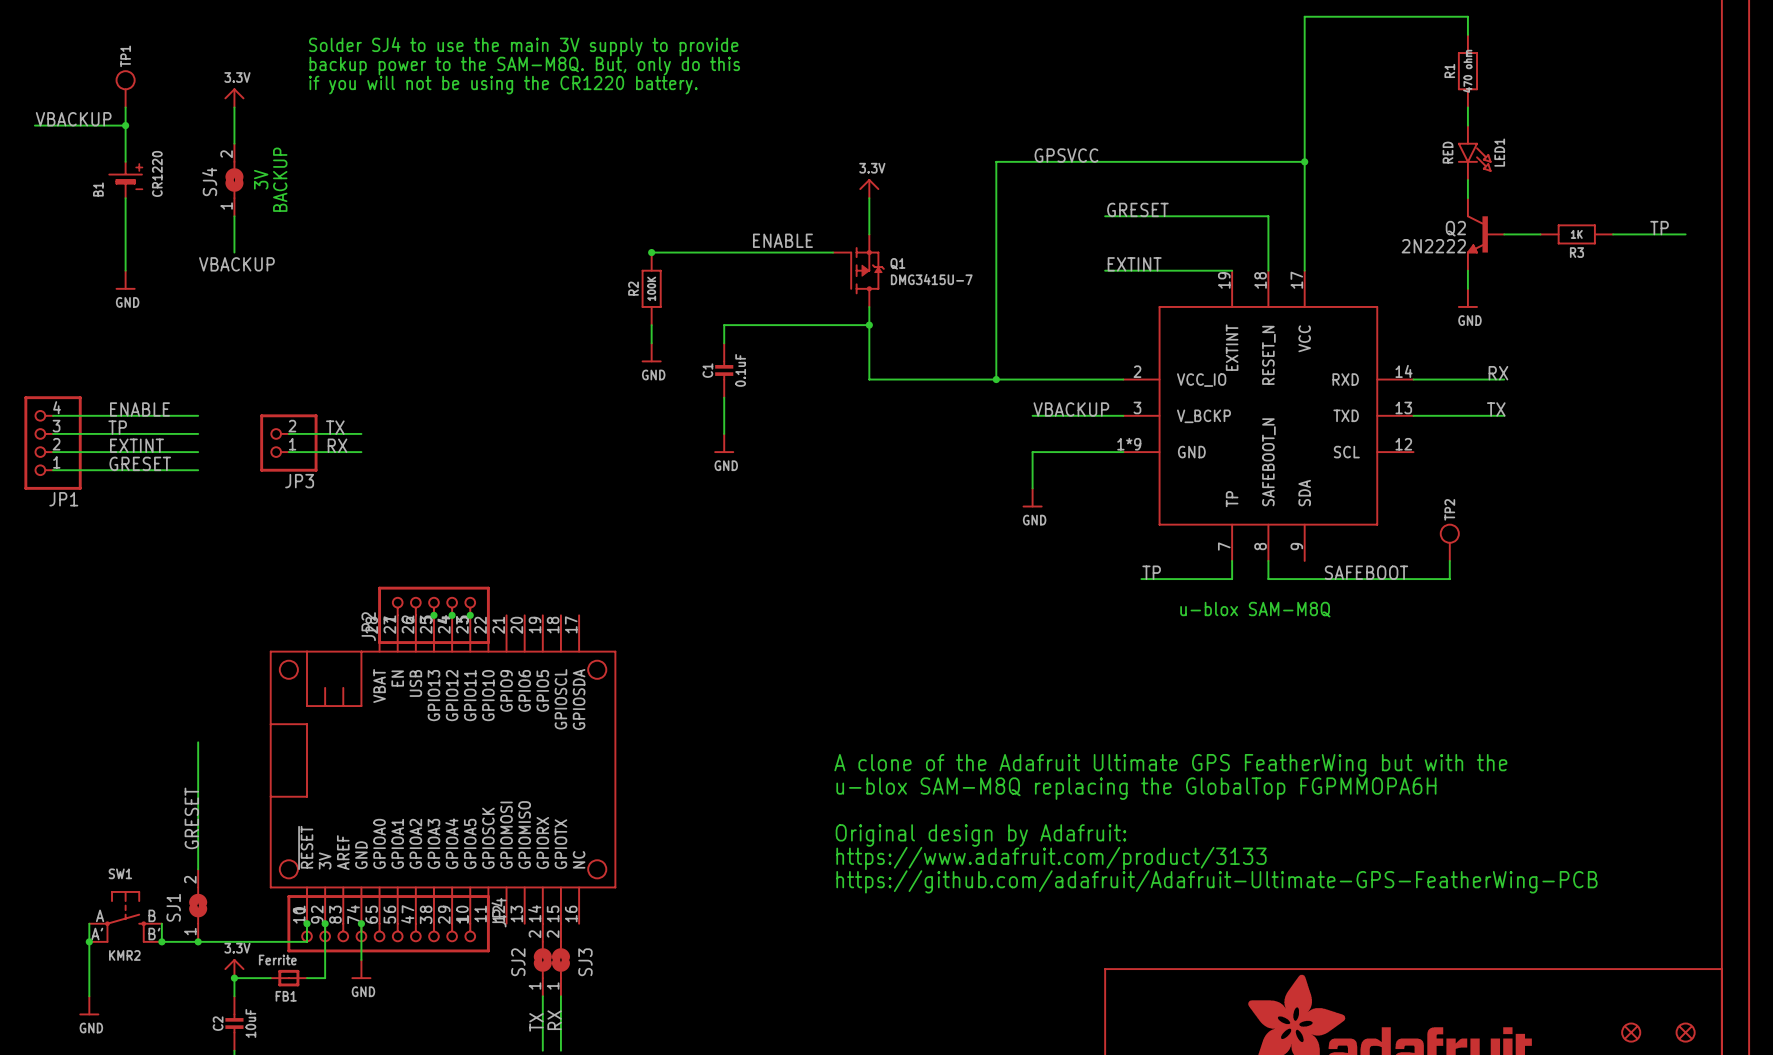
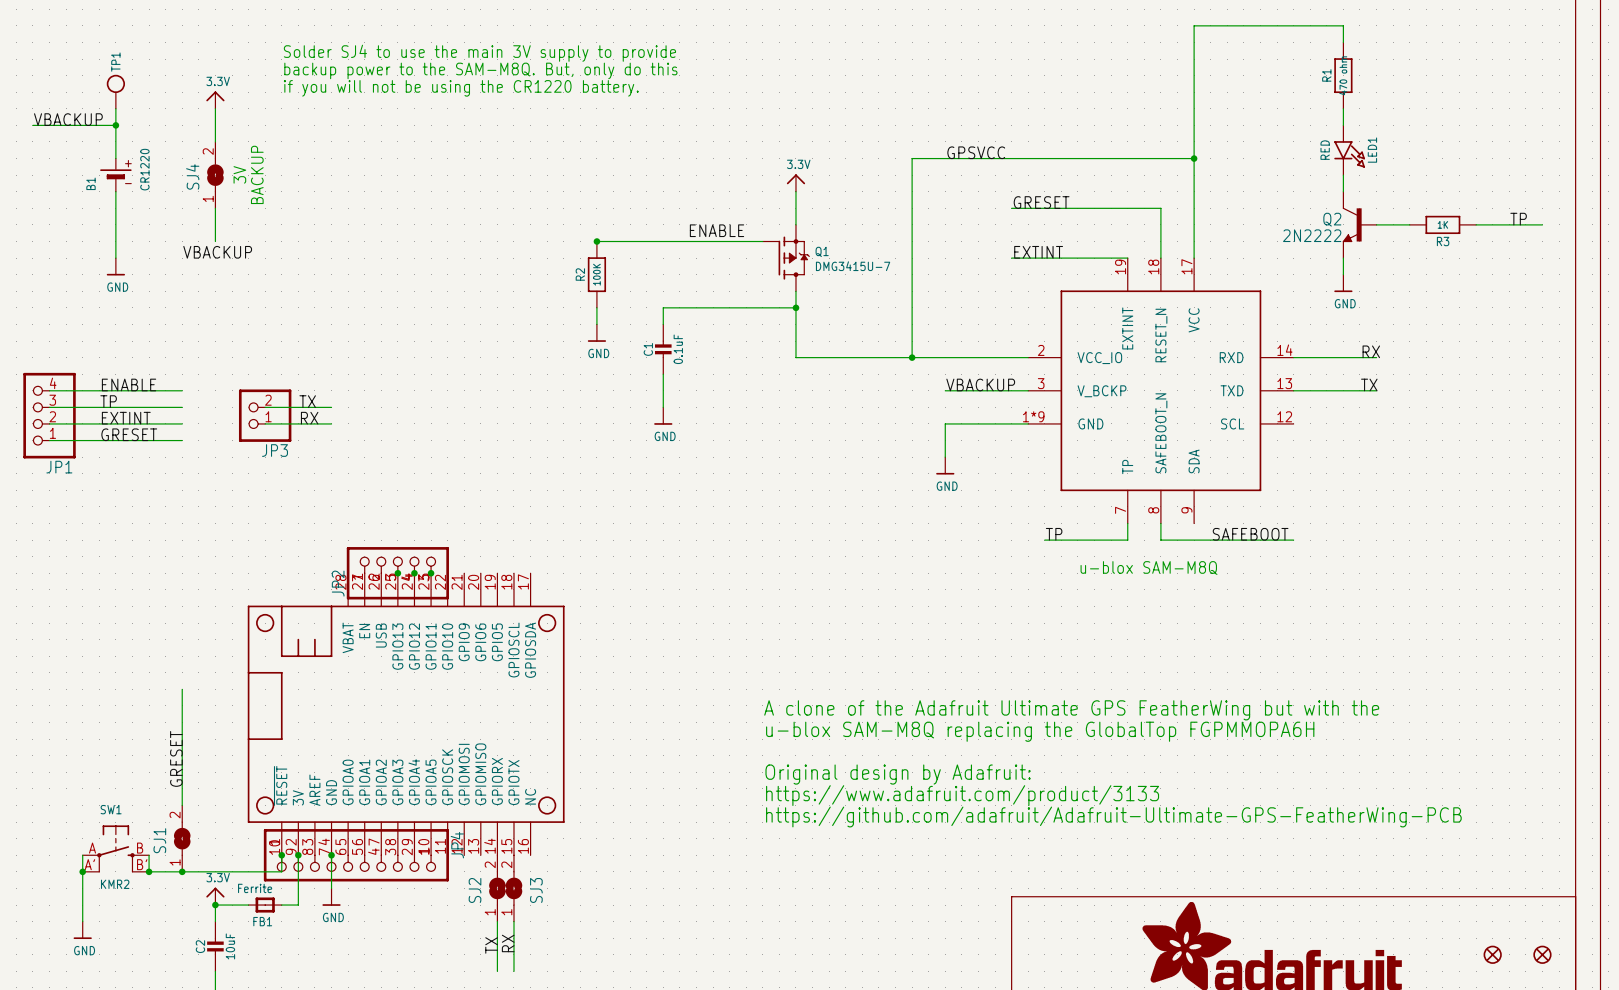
TP2: (1449, 542) -> none
wire: (1449, 560) (1449, 579) (1413, 579) -> none

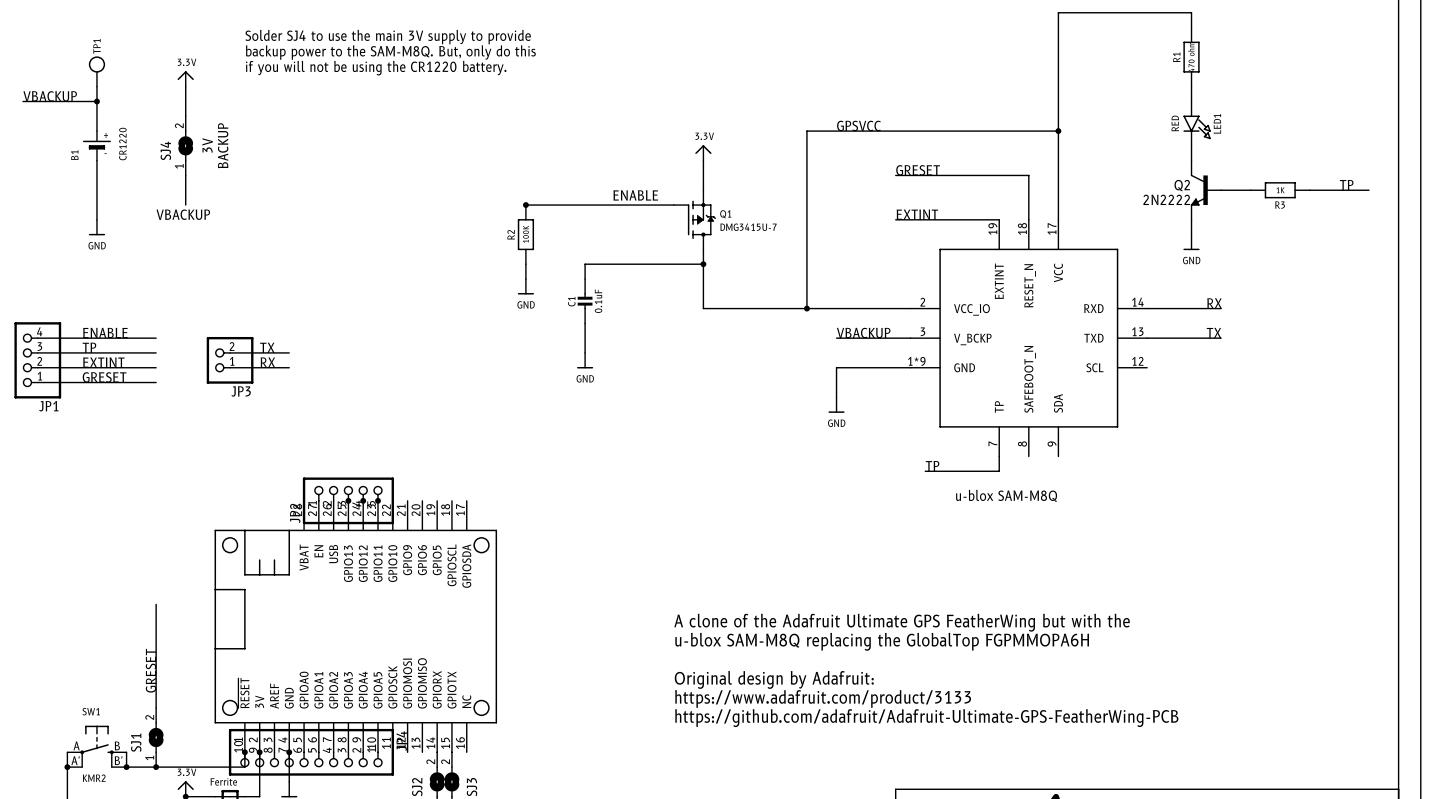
wire: (1160, 523) (1160, 540) (1293, 540) -> none
label: SAFEBOOT (1250, 534) -> none

